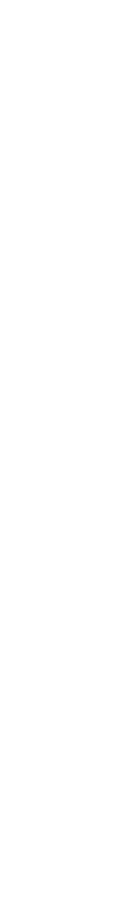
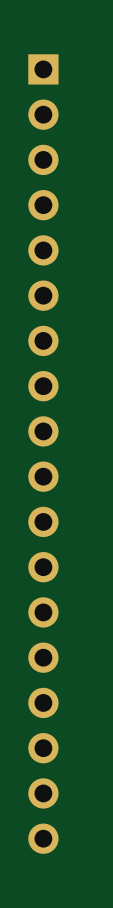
part: none -> (43, 454)

